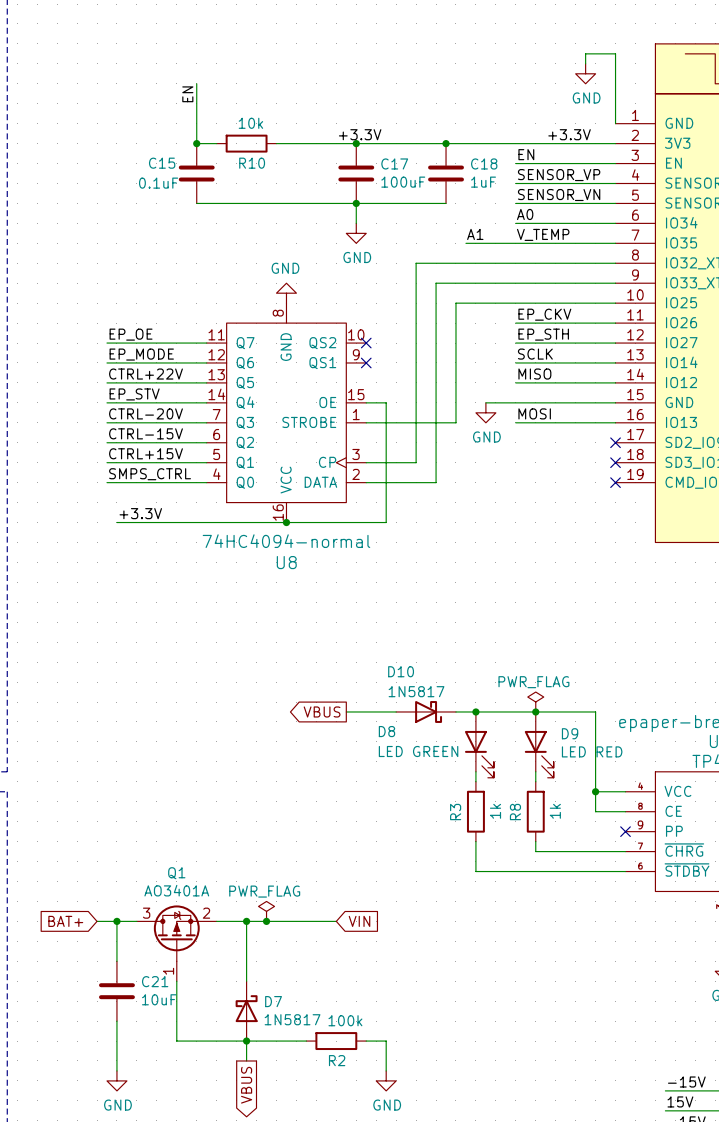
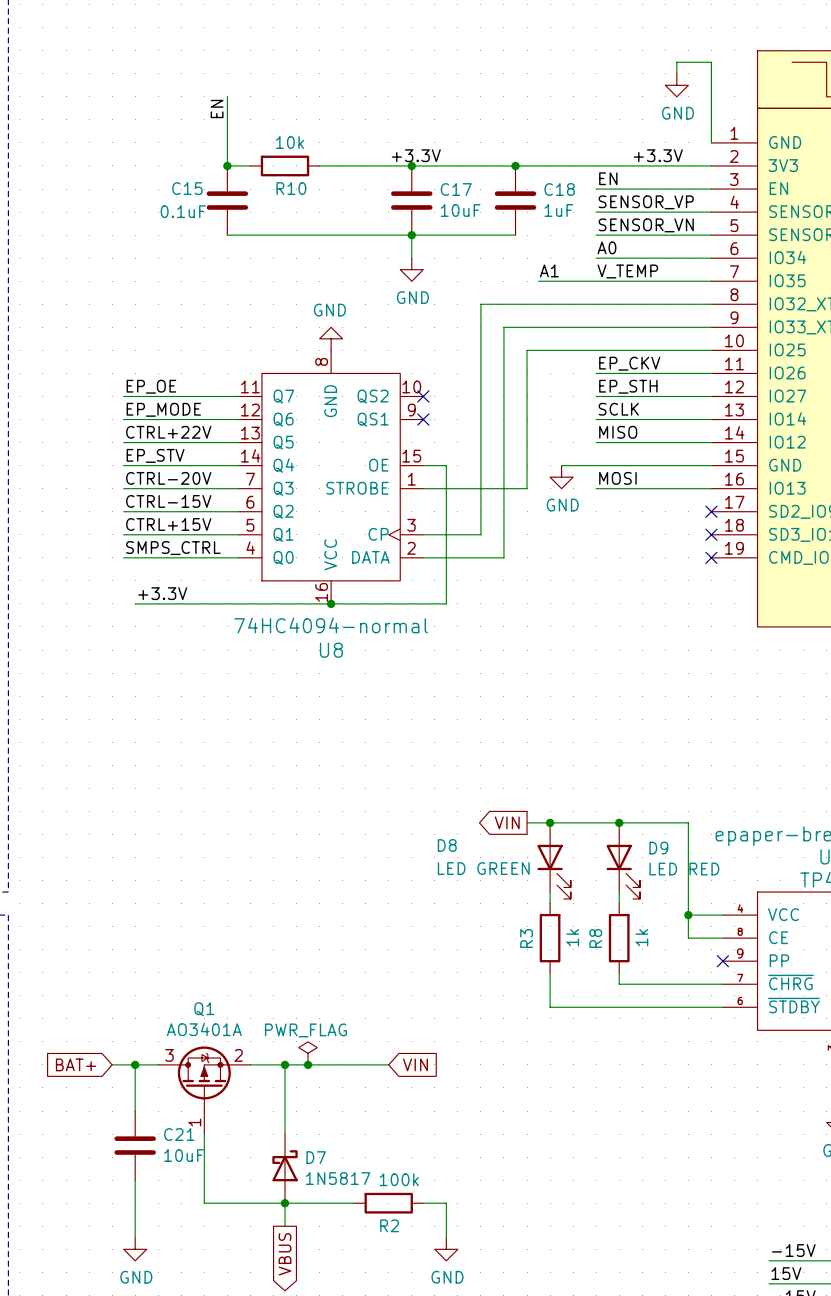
C17 value: 100uF (403, 182) -> 10uF (460, 210)
power symbol: PWR_FLAG (535, 702) -> none
global label: VBUS (322, 711) -> none
wire: (346, 711) (396, 711) -> none
D10: 1N5817 (426, 711) -> none
global label: none -> VIN (507, 822)

